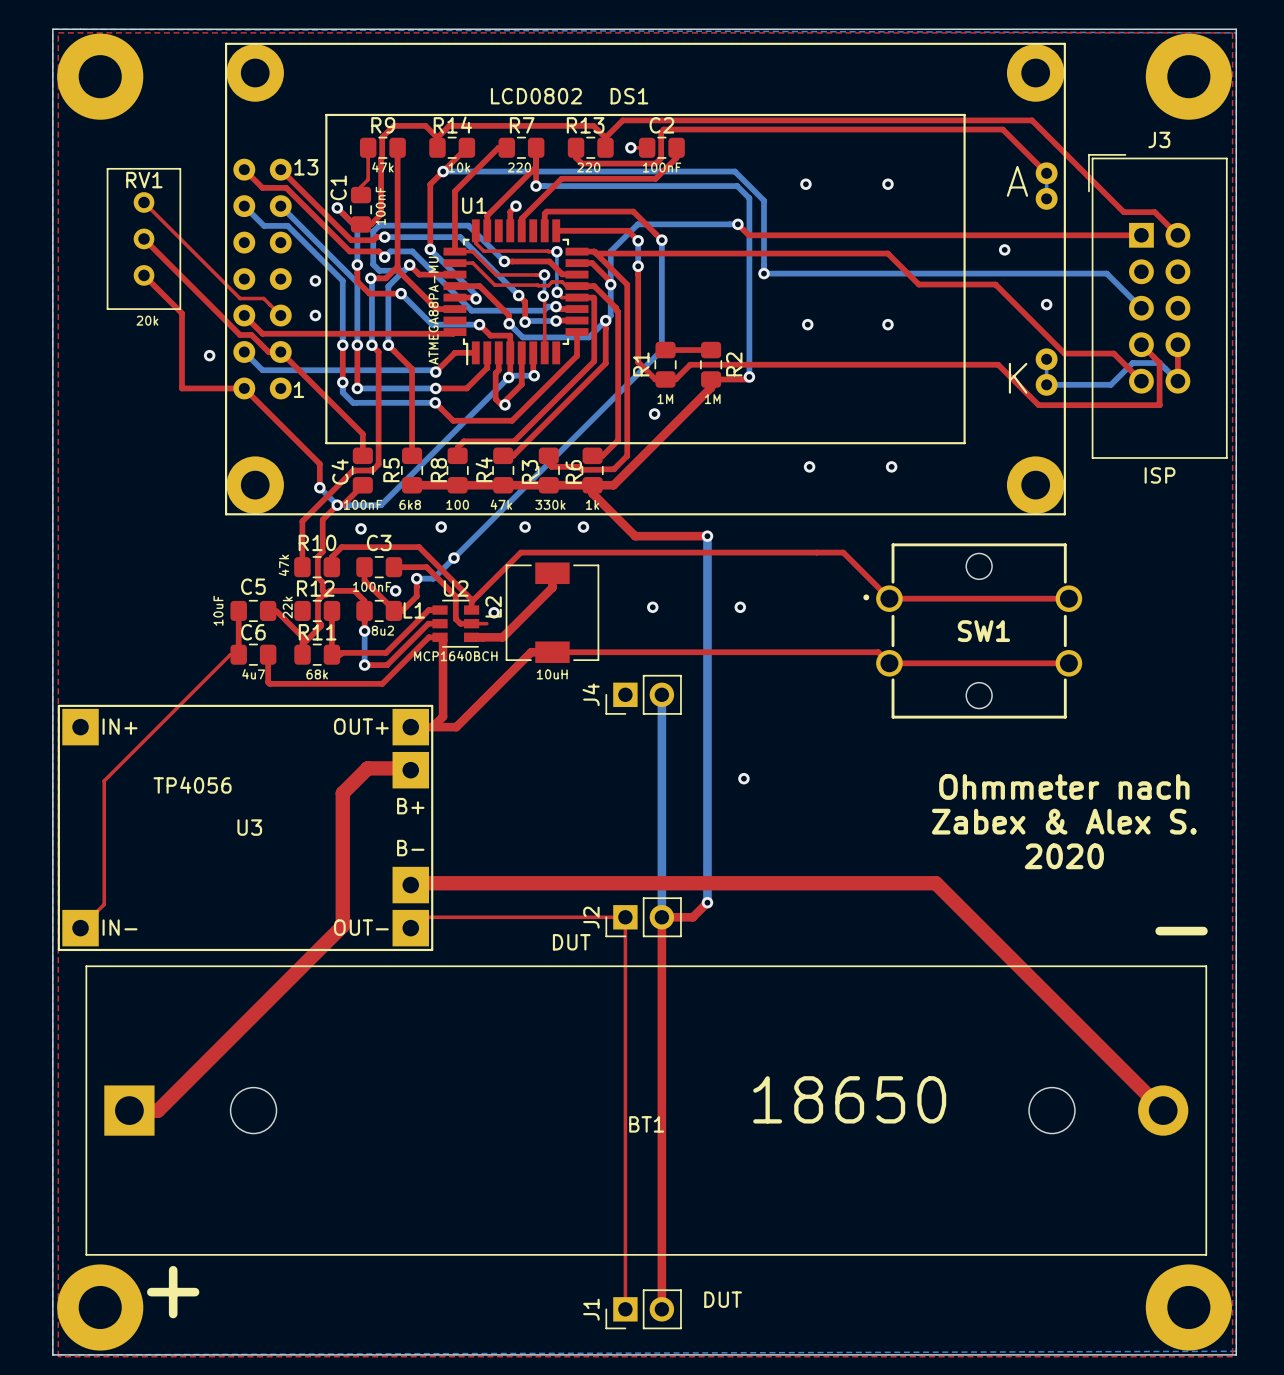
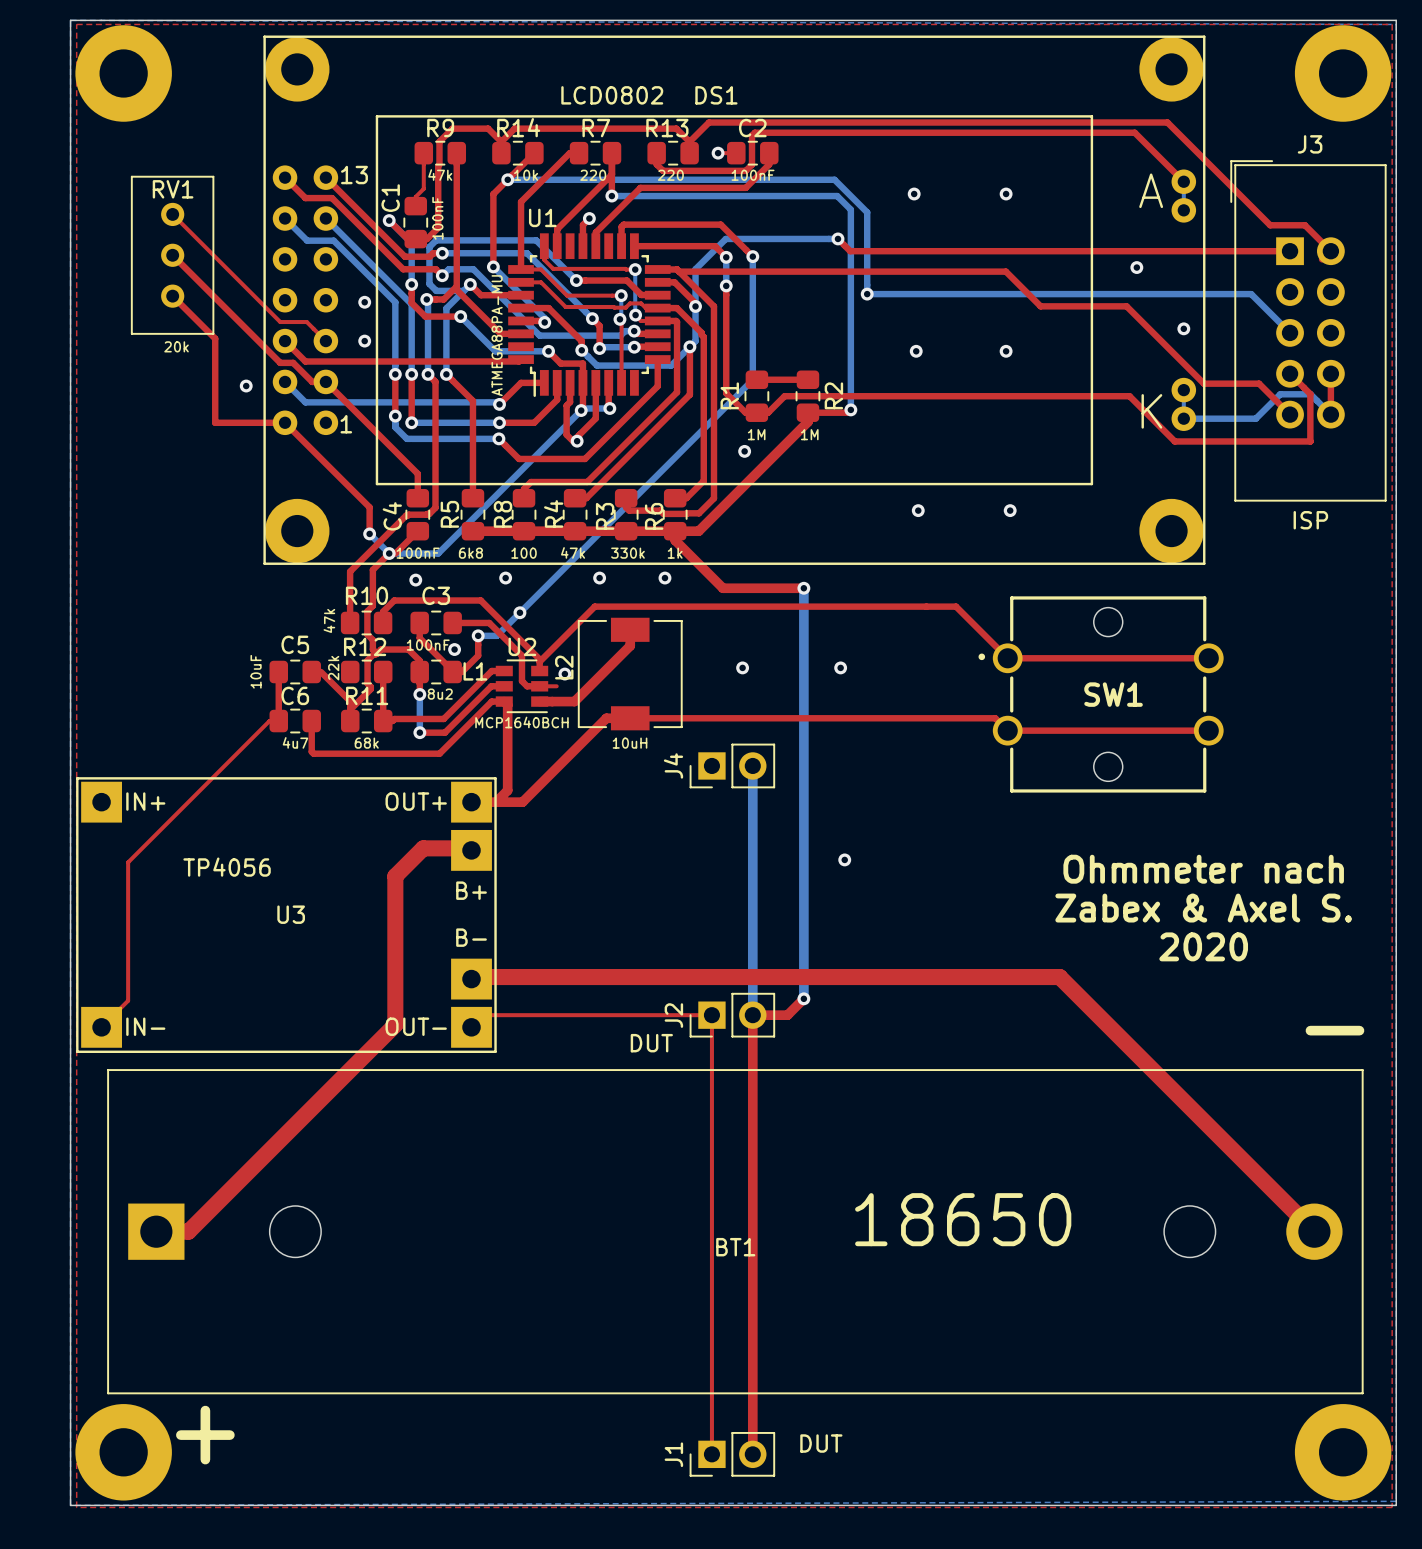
text: Zabex & Alex S. (1064, 821) -> Zabex & Axel S. (1203, 908)

